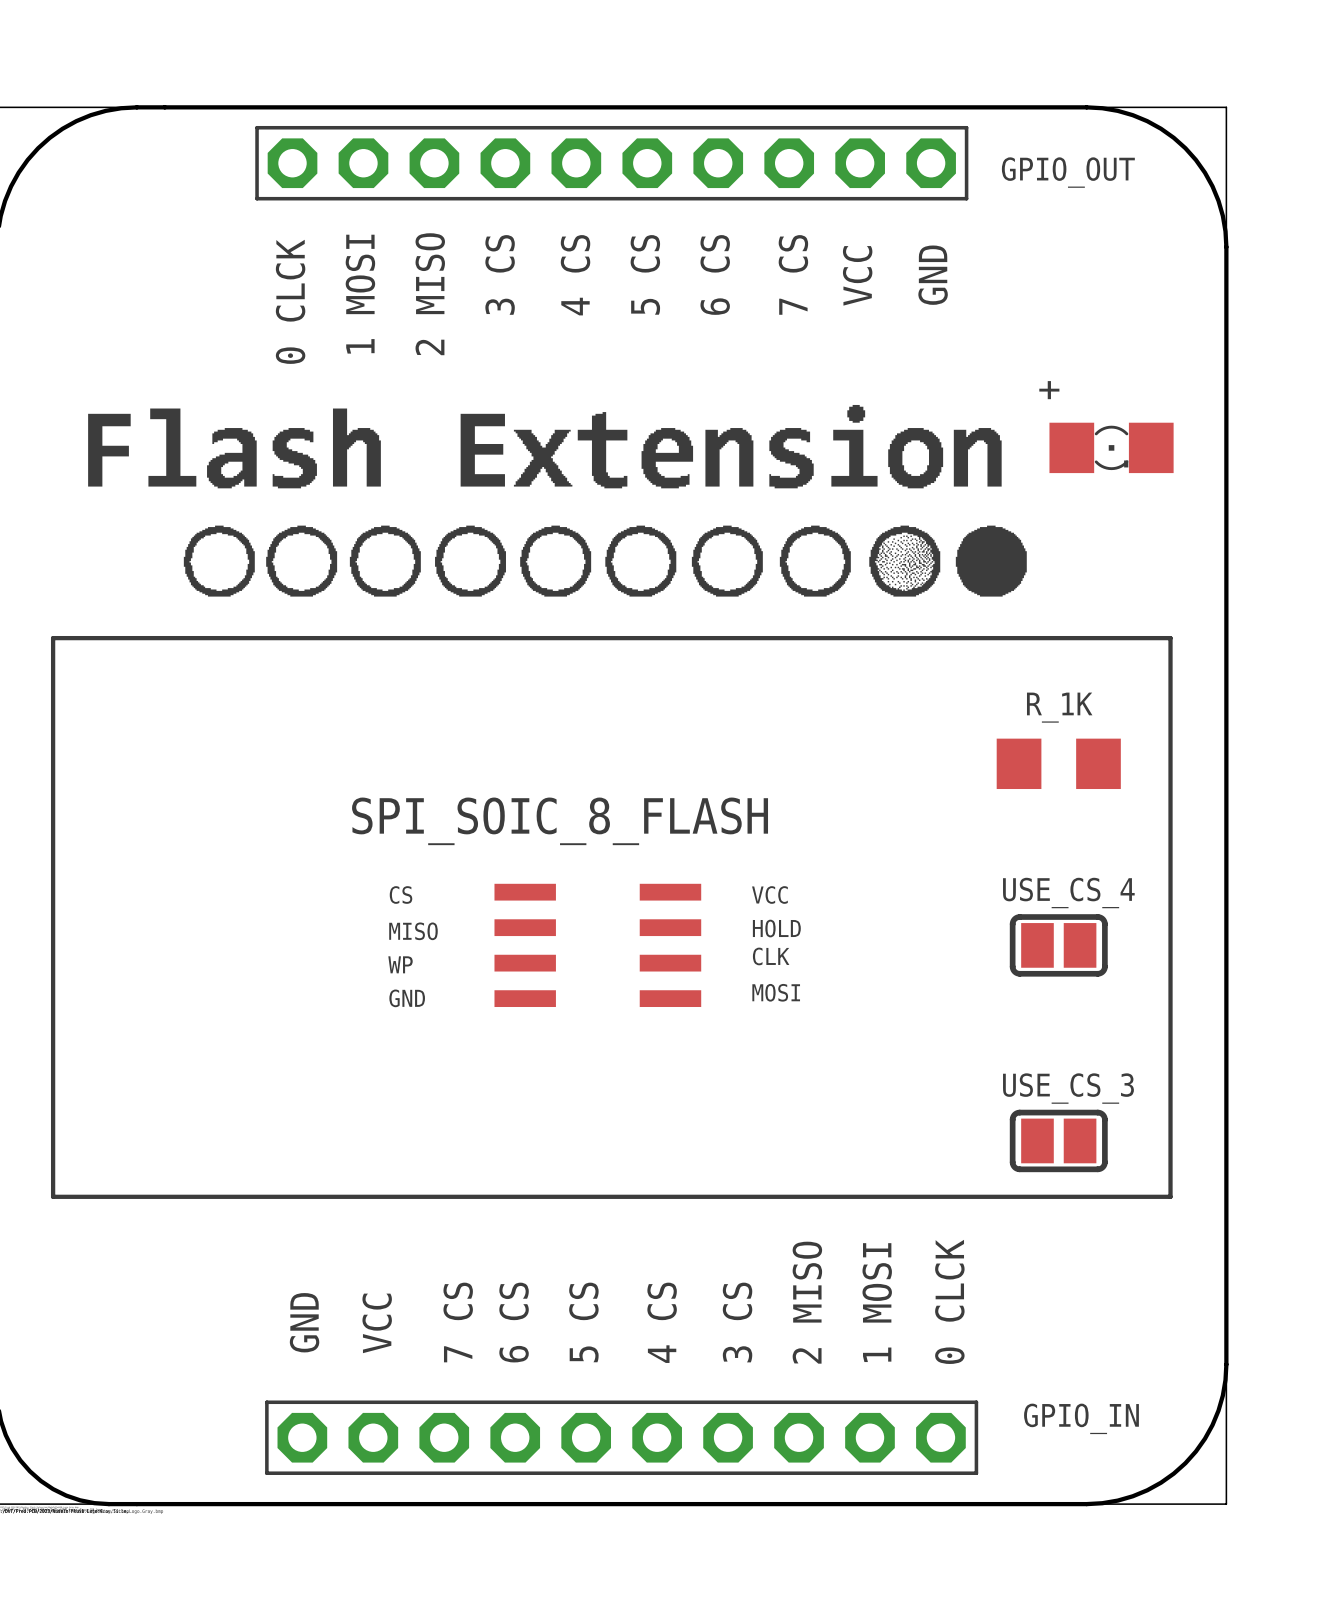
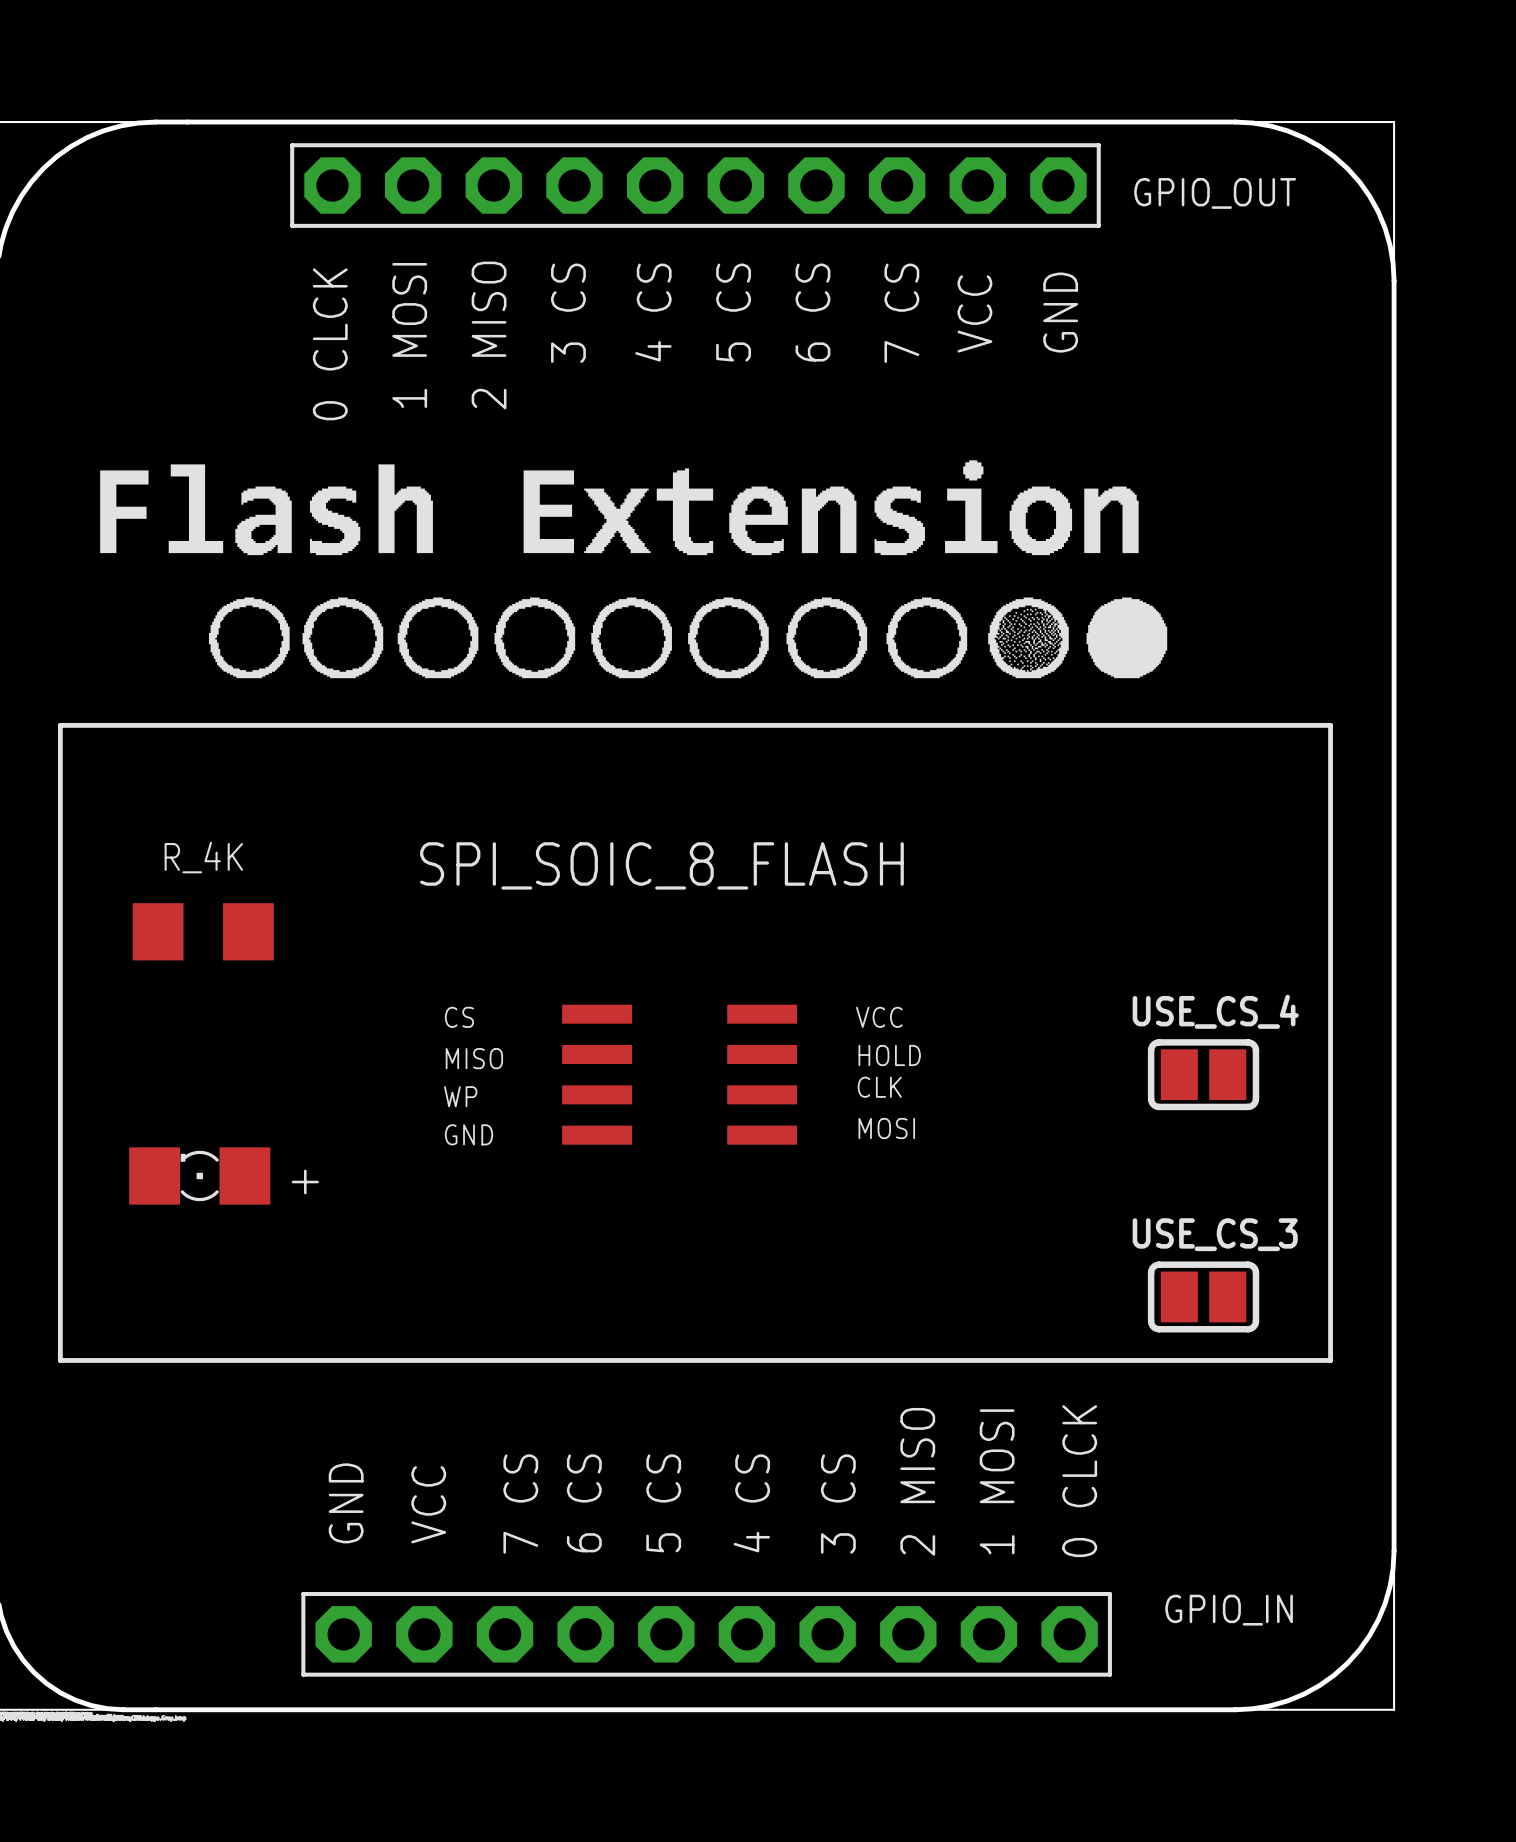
text: + (1049, 390) -> none
part: (1111, 447) -> none
R_1K: (1058, 763) -> none
R_4K: none -> (203, 931)
SPI_SOIC_8_FLASH name position: SPI_SOIC_8_FLASH (560, 821) -> SPI_SOIC_8_FLASH (661, 865)
part: none -> (199, 1175)
text: none -> + (305, 1182)

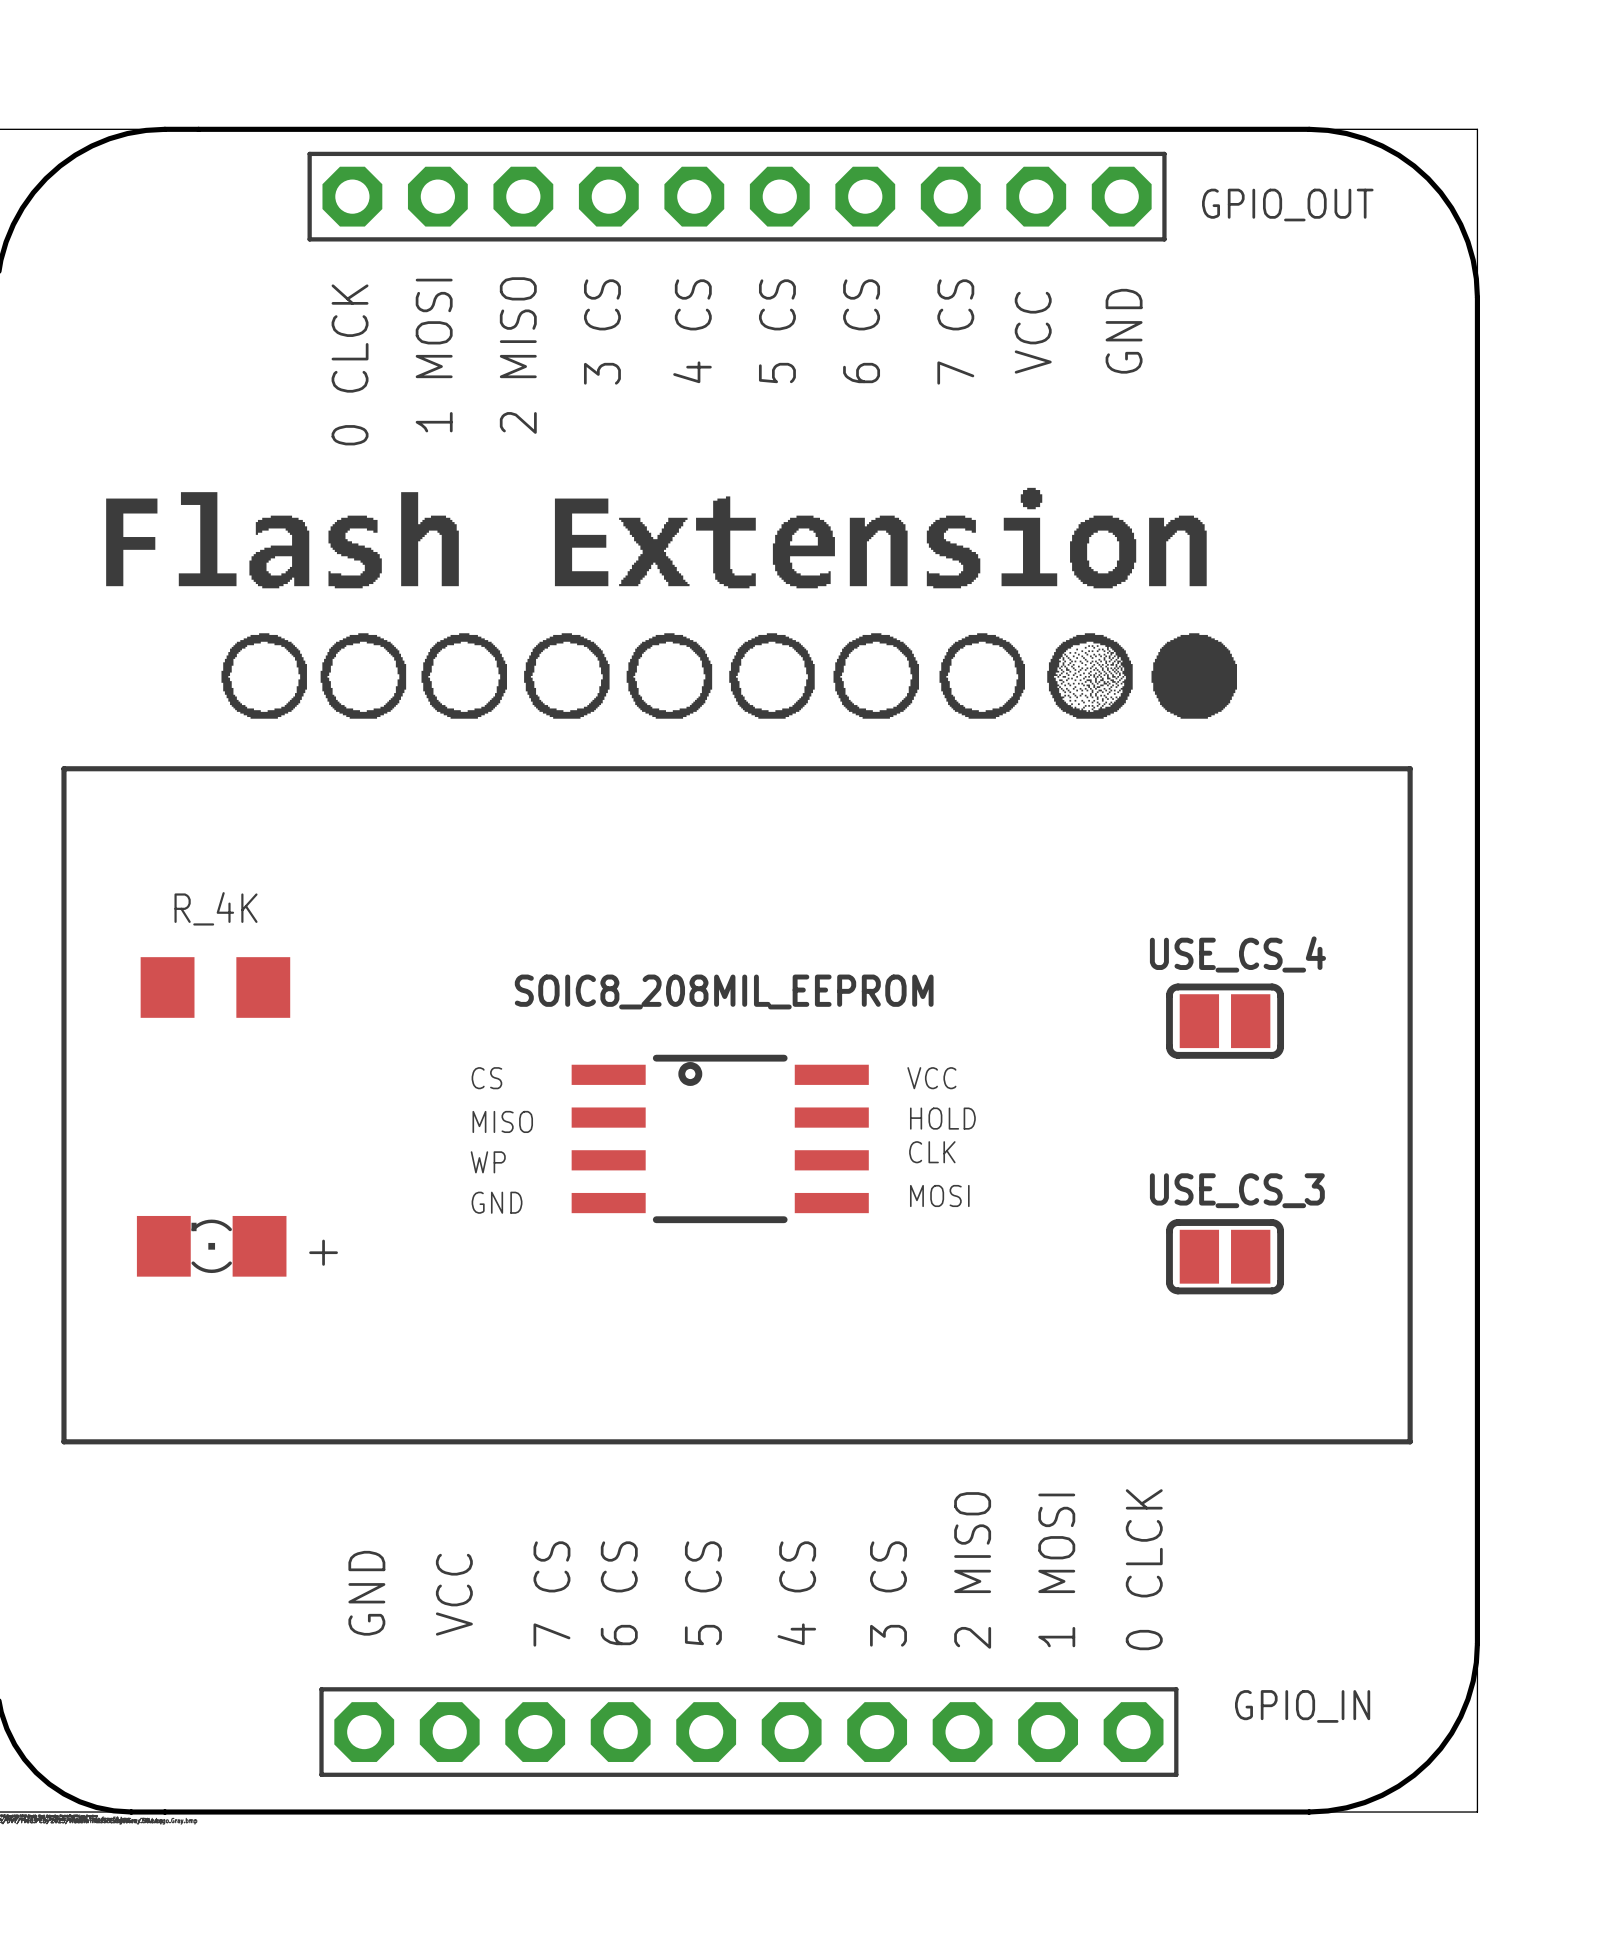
SPI_SOIC_8_FLASH: (679, 1074) -> none
SOIC8_208MIL_EEPROM: none -> (720, 1138)
USE_CS_4 position: (1203, 1074) -> (1225, 1021)
USE_CS_3 position: (1203, 1296) -> (1225, 1256)

